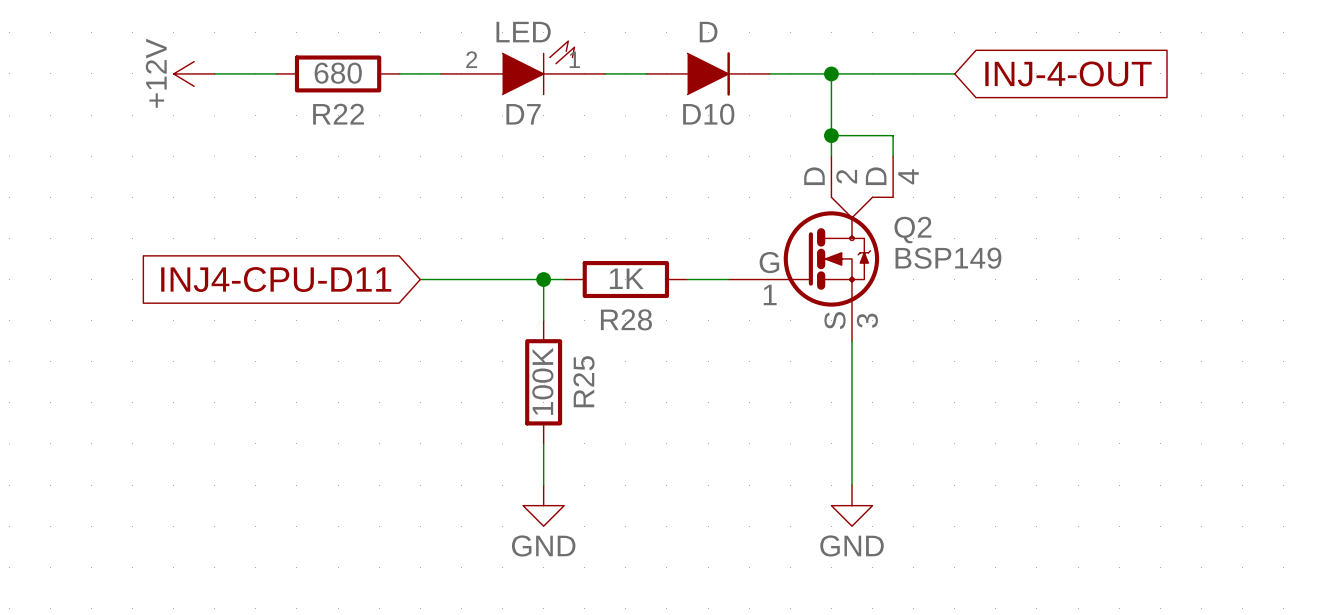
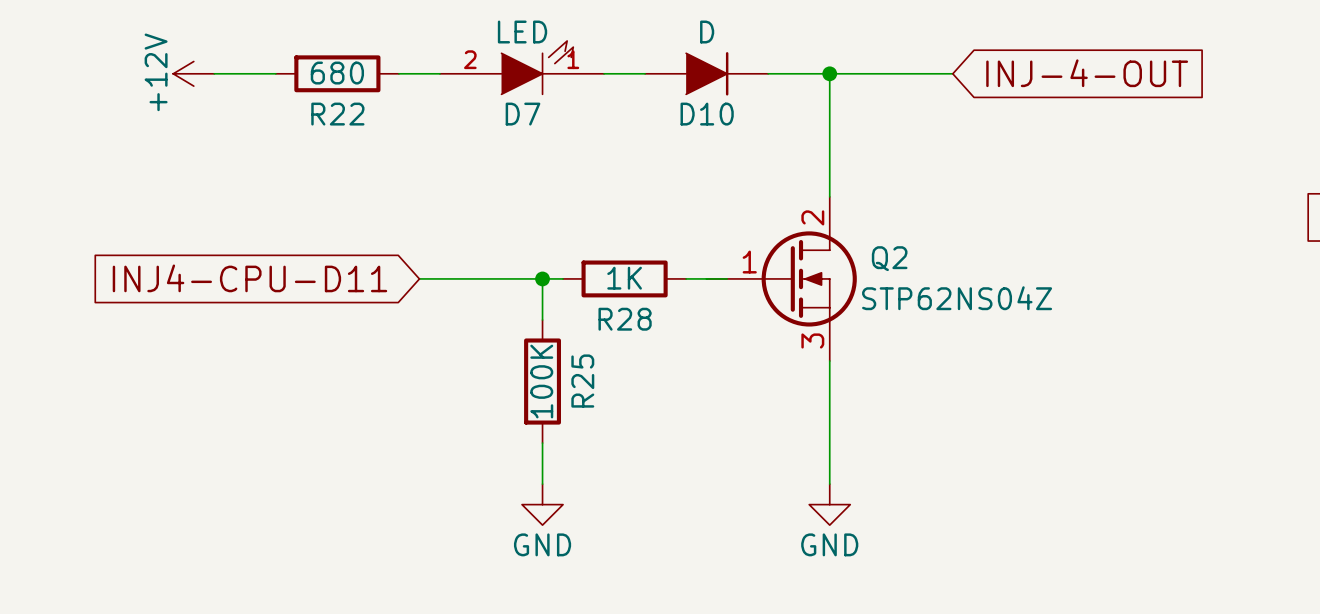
wire: (831, 135) (893, 135) (893, 156) -> none
junction: (831, 135) -> none
Q2 symbol: [728, 156, 894, 342] -> [706, 196, 857, 362]
Q2 value: BSP149 (948, 258) -> STP62NS04Z (957, 298)
wire: (851, 341) (851, 485) -> none
wire: none -> (829, 361) (829, 484)
power symbol position: GND (851, 505) -> GND (829, 504)

